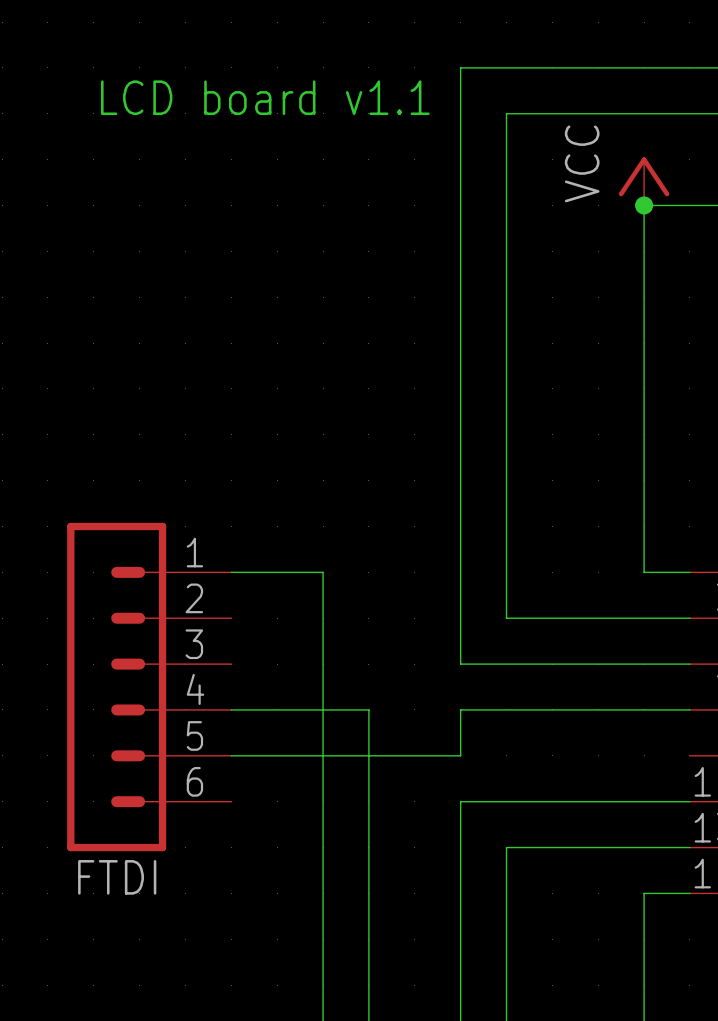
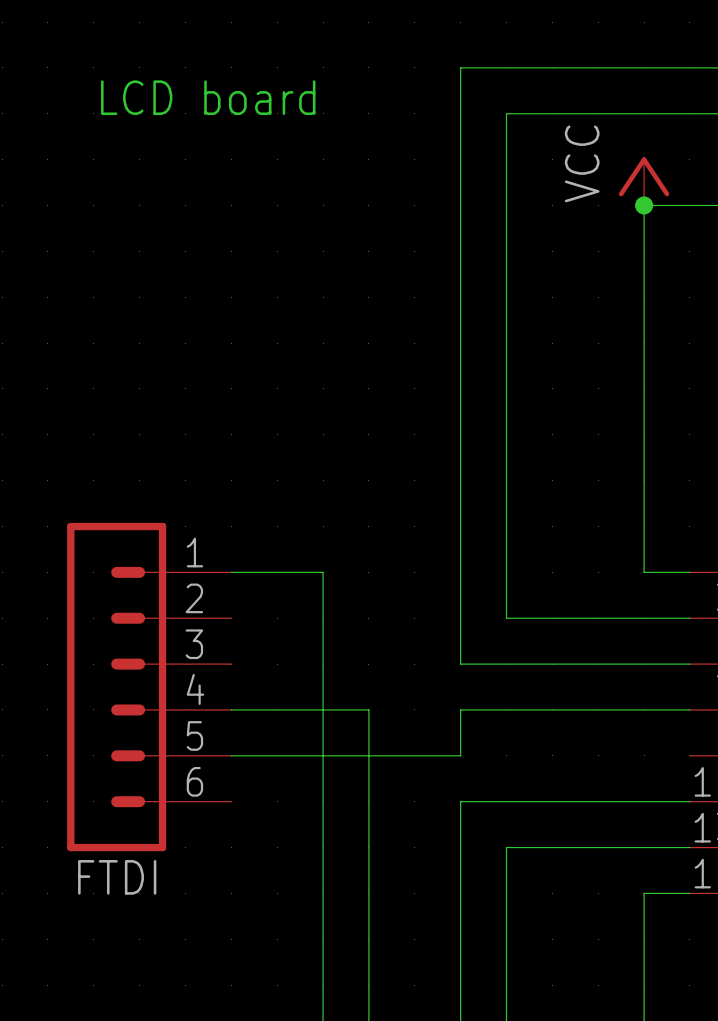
text: LCD board v1.1 (265, 97) -> LCD board (208, 97)

